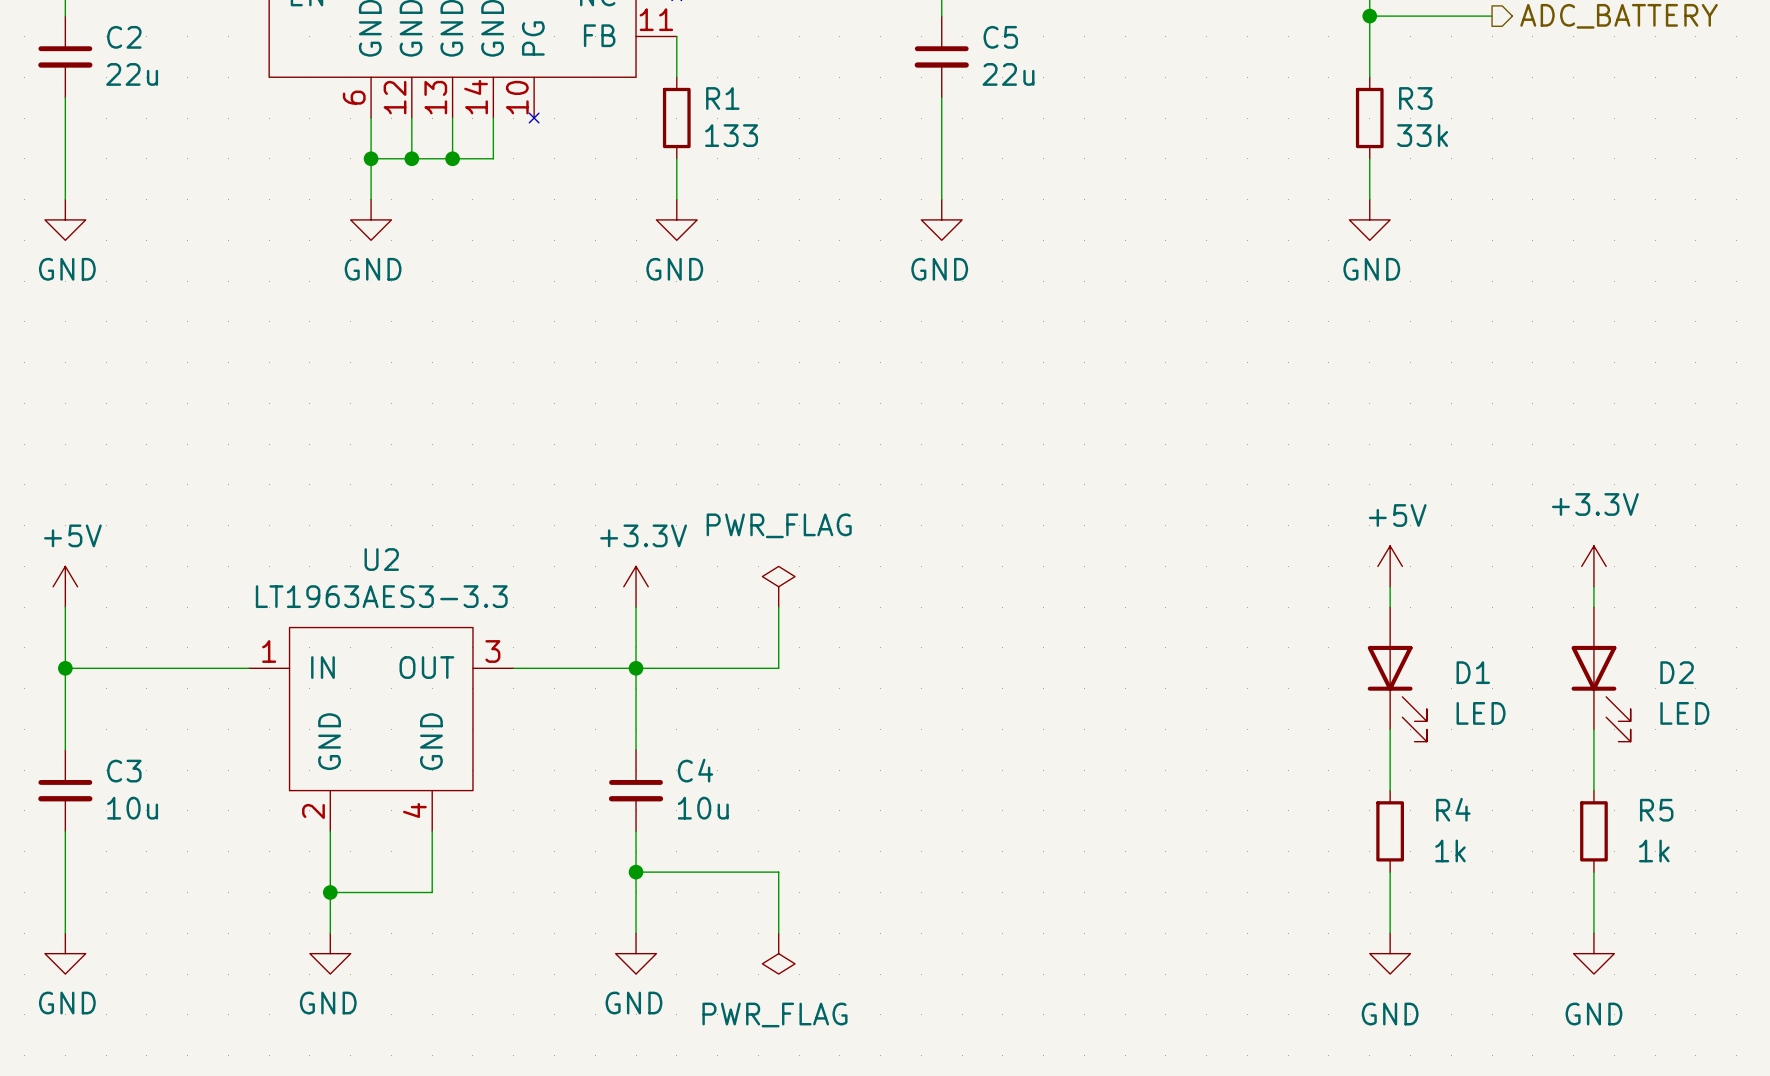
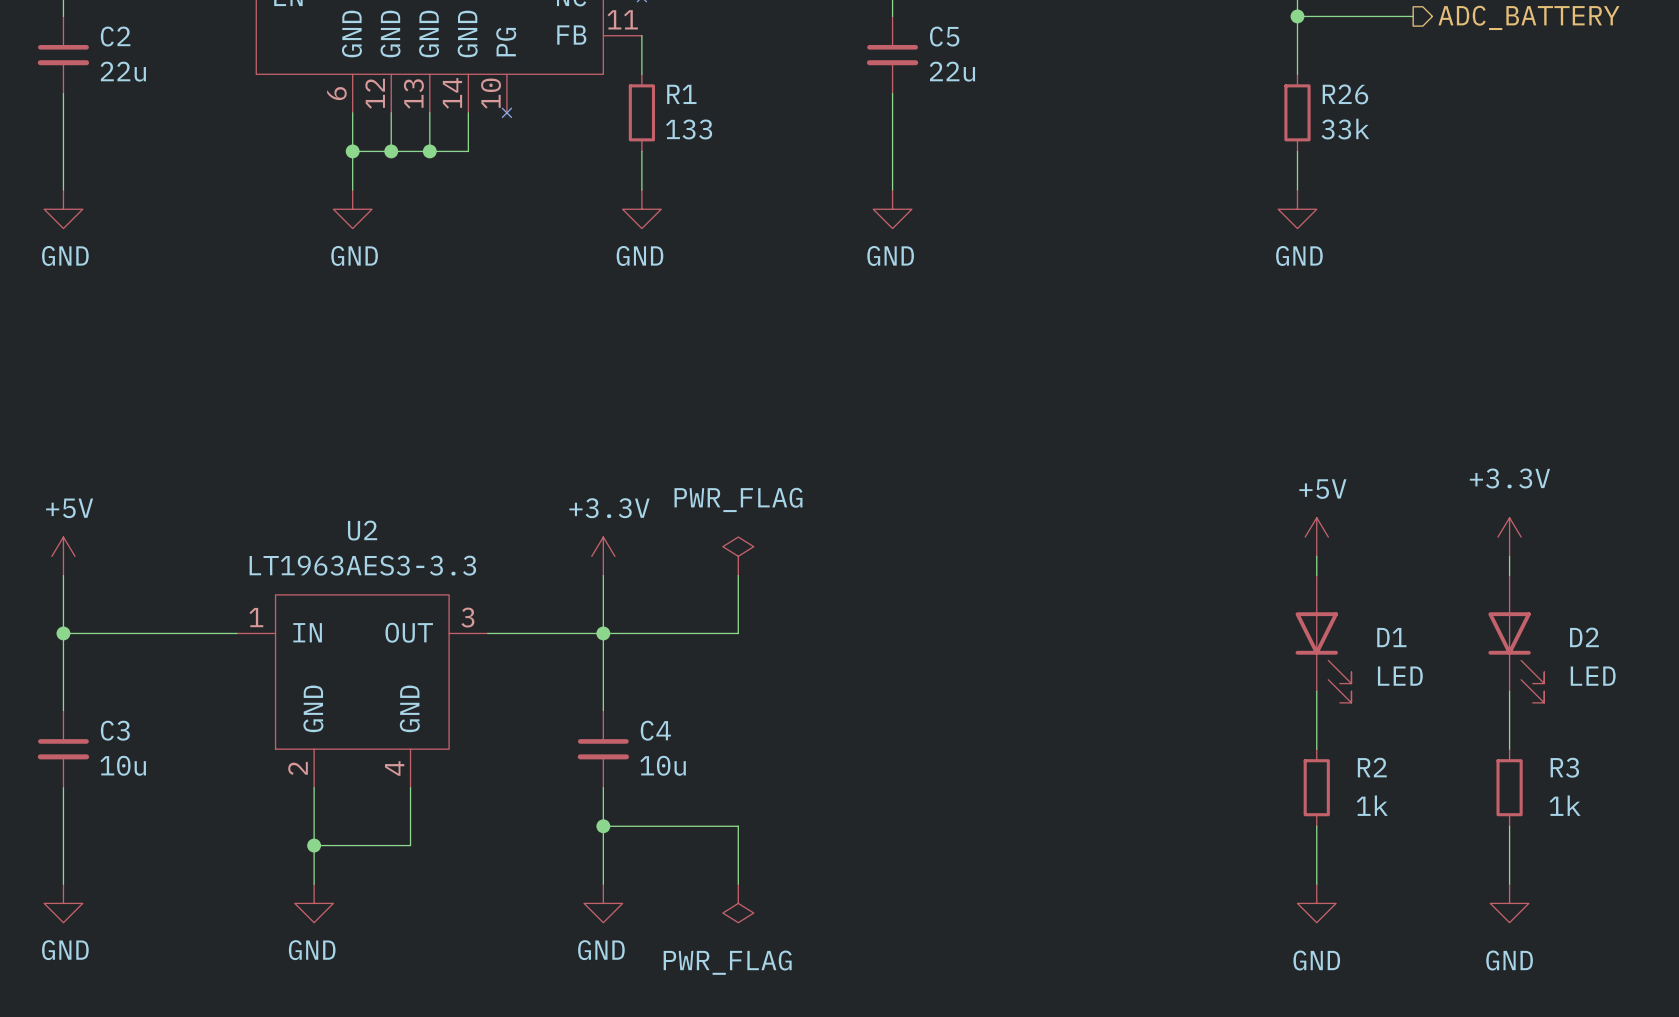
R3 name: R3 (1415, 98) -> R26 (1345, 94)
R4 name: R4 (1453, 809) -> R2 (1372, 767)
R5 name: R5 (1656, 810) -> R3 (1564, 767)

